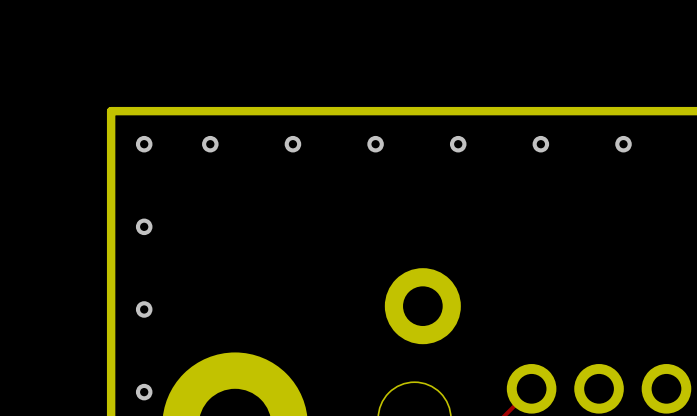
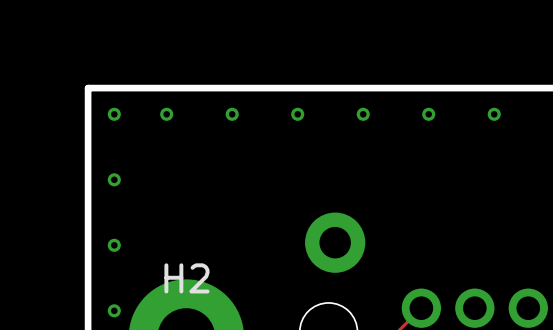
H2 name: none -> H2 (186, 278)

